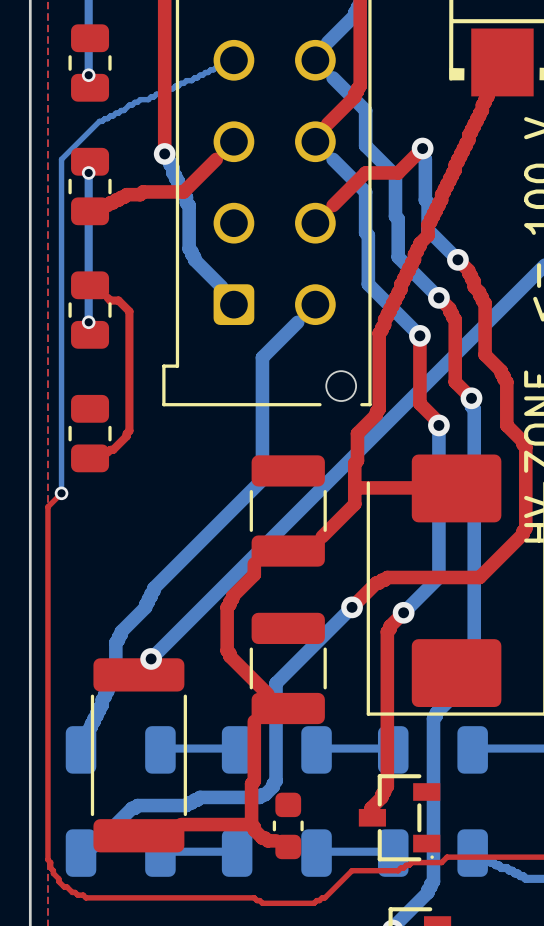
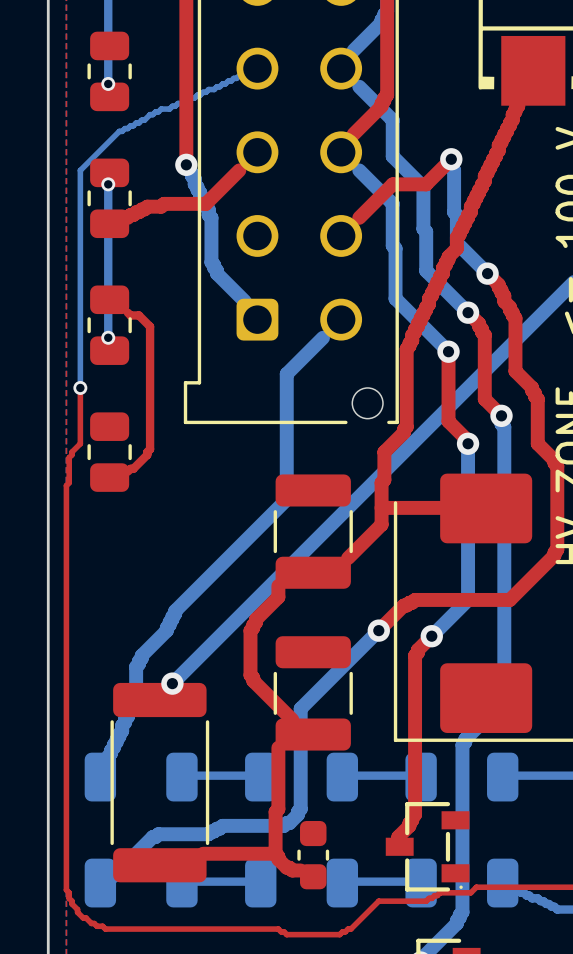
bottom track: (61, 371) (61, 493) -> none
top track: (61, 493) (47, 506) -> (80, 387) (80, 443) (69, 457) (69, 482) (66, 485) (66, 527)
via position: (61, 493) -> (80, 387)

